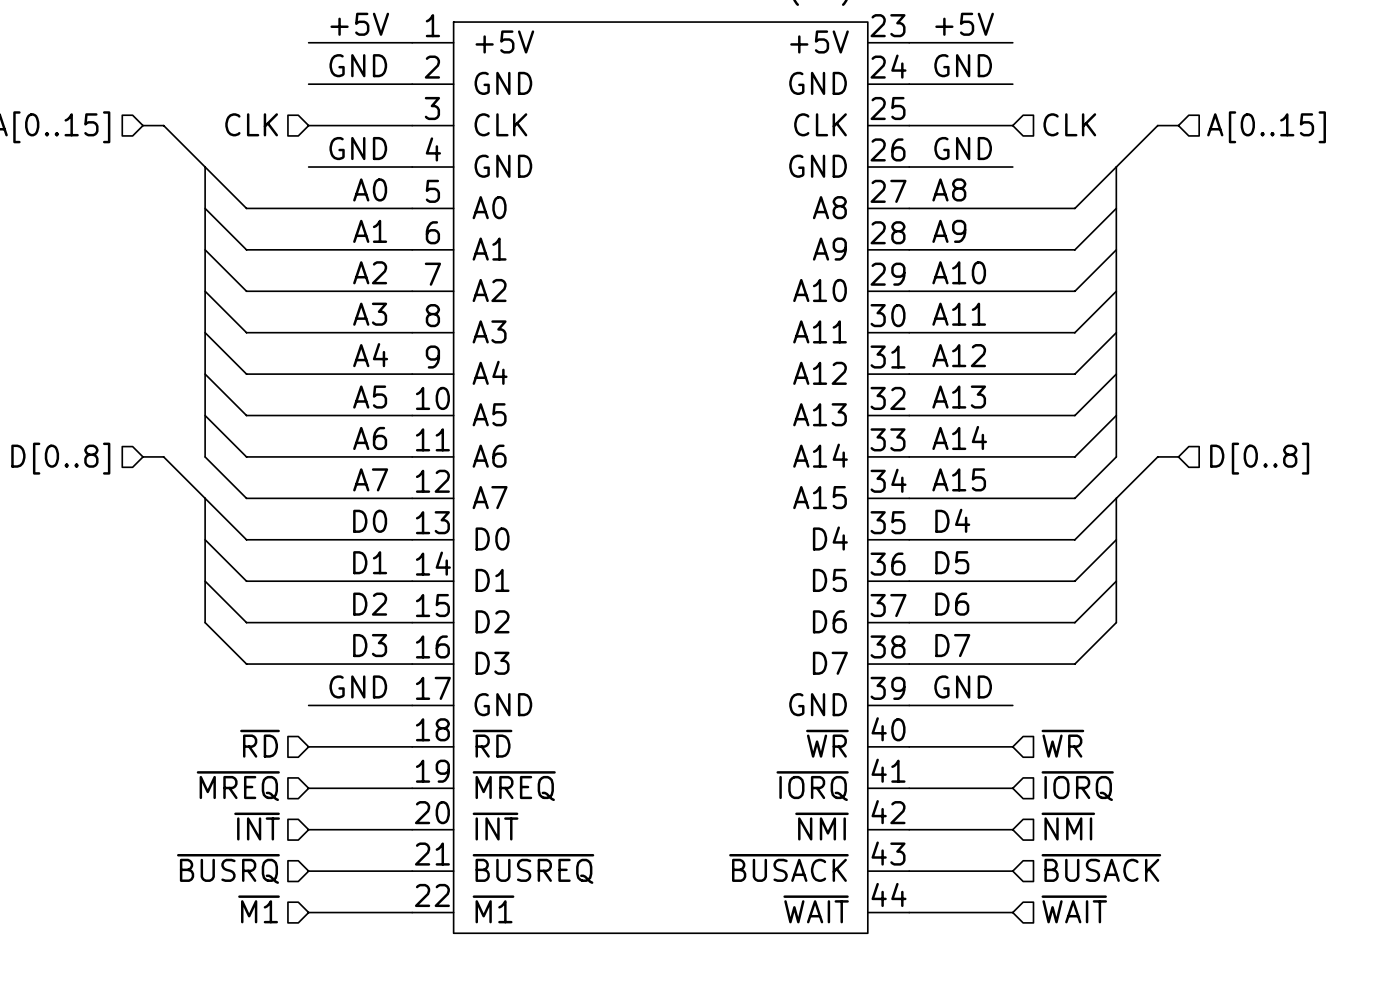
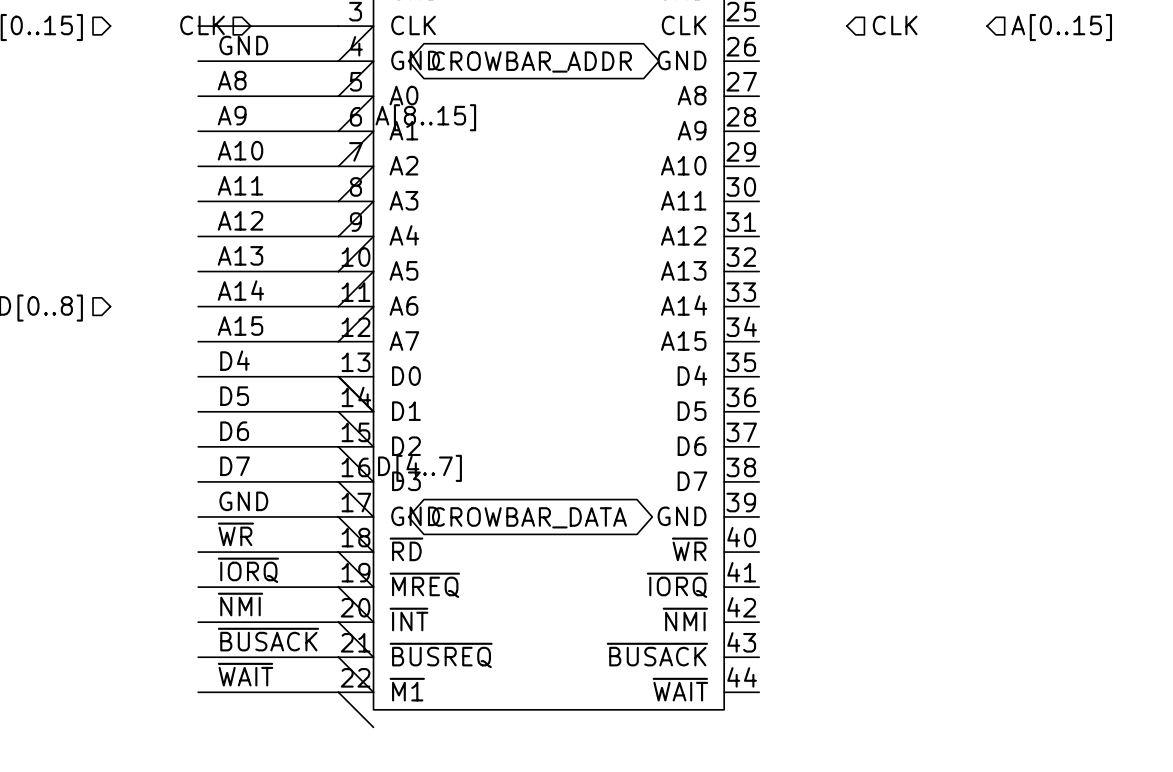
bus: (142, 125) (163, 125) (205, 167) (205, 456) -> none
wire: none -> (198, 26) (250, 26)
wire: none -> (373, 26) (338, 61)
wire: (909, 125) (1012, 125) -> none
bus: (1178, 125) (1157, 125) (1116, 167) (1116, 456) -> none
label position: GND (358, 148) -> GND (243, 45)
label: GND (963, 148) -> none
wire: (205, 167) (246, 208) -> none
wire: none -> (198, 61) (250, 61)
wire: none -> (373, 61) (338, 96)
global label: none -> CROWBAR_ADDR (531, 61)
wire: (909, 167) (1012, 167) -> none
wire: (1116, 167) (1074, 208) (909, 208) -> none
label: none -> A8 (232, 80)
label: A0 (370, 189) -> none
label: A8 (949, 189) -> none
wire: (205, 208) (246, 249) -> none
wire: none -> (373, 96) (338, 131)
wire: (1116, 208) (1074, 249) (909, 249) -> none
label: none -> A9 (232, 115)
label: A1 (370, 231) -> none
label: A9 (949, 231) -> none
label: none -> A[8..15] (425, 117)
wire: (205, 249) (246, 291) -> (338, 376) (373, 411)
wire: none -> (373, 131) (338, 166)
wire: (1116, 249) (1074, 291) (909, 291) -> none
label: none -> A10 (240, 150)
label: A2 (370, 272) -> none
label: A10 (959, 272) -> none
wire: (205, 291) (246, 332) -> (338, 411) (373, 446)
wire: none -> (373, 166) (338, 201)
wire: (1116, 291) (1074, 332) (909, 332) -> none
label: none -> A11 (240, 185)
label: A3 (370, 314) -> none
label: A11 (959, 314) -> none
wire: (205, 332) (246, 374) -> (338, 446) (373, 481)
wire: none -> (373, 201) (338, 236)
wire: (1116, 332) (1074, 374) (909, 374) -> none
label: none -> A12 (240, 220)
label: A4 (370, 355) -> none
label: A12 (959, 355) -> none
wire: (205, 374) (246, 415) -> (338, 481) (373, 516)
wire: none -> (373, 236) (338, 271)
wire: (1116, 374) (1074, 415) (909, 415) -> none
label: none -> A13 (240, 255)
label: A5 (370, 397) -> none
label: A13 (959, 397) -> none
wire: (205, 415) (246, 456) -> (338, 516) (373, 552)
wire: none -> (373, 271) (338, 306)
wire: (1116, 415) (1074, 456) (909, 456) -> none
label: none -> A14 (240, 290)
label: A14 (959, 437) -> none
label: A6 (370, 438) -> none
bus: (142, 456) (163, 456) (205, 498) (205, 622) -> none
wire: (205, 456) (246, 498) -> (338, 552) (373, 587)
wire: none -> (373, 306) (338, 341)
wire: (1116, 456) (1074, 498) (909, 498) -> none
bus: (1178, 456) (1157, 456) (1116, 498) (1116, 622) -> none
hierarchical label: D[0..8] (1259, 458) -> none
label: none -> A15 (240, 326)
label: A7 (370, 479) -> none
label: A15 (959, 479) -> none
wire: (205, 498) (246, 539) -> (338, 587) (373, 622)
wire: (1116, 498) (1074, 539) (909, 539) -> none
label: none -> D4 (235, 360)
label: D4 (952, 520) -> none
label: D0 (370, 521) -> none
wire: (205, 539) (246, 581) -> (338, 622) (373, 657)
wire: (1116, 539) (1074, 581) (909, 581) -> none
label: none -> D5 (234, 396)
label: D1 (370, 562) -> none
label: D5 (952, 562) -> none
wire: (205, 581) (246, 622) -> (338, 657) (373, 692)
wire: (1116, 581) (1074, 622) (909, 622) -> none
label: none -> D6 (234, 431)
label: D2 (370, 604) -> none
label: D6 (952, 604) -> none
wire: (205, 622) (246, 664) -> (338, 692) (373, 727)
wire: (1116, 622) (1074, 664) (909, 664) -> none
label: none -> D7 (235, 466)
label: D3 (370, 645) -> none
label: D7 (952, 645) -> none
label: none -> D[4..7] (419, 468)
label position: GND (358, 686) -> GND (243, 501)
label: GND (963, 686) -> none
wire: none -> (198, 516) (250, 516)
wire: (909, 705) (1012, 705) -> none
global label: none -> CROWBAR_DATA (529, 517)
label: none -> ~{WR} (235, 534)
hierarchical label: ~{RD} (260, 743) -> none
hierarchical label: ~{WR} (1062, 743) -> none
wire: none -> (198, 552) (250, 552)
wire: (909, 746) (1012, 746) -> none
label: none -> ~{IORQ} (248, 570)
hierarchical label: ~{MREQ} (238, 786) -> none
hierarchical label: ~{IORQ} (1077, 786) -> none
wire: none -> (198, 587) (250, 587)
wire: (909, 788) (1012, 788) -> none
label: none -> ~{NMI} (240, 604)
hierarchical label: ~{INT} (257, 826) -> none
hierarchical label: ~{NMI} (1068, 826) -> none
wire: none -> (198, 622) (250, 622)
wire: (909, 829) (1012, 829) -> none
label: none -> ~{BUSACK} (268, 639)
hierarchical label: ~{BUSACK} (1101, 867) -> none
hierarchical label: ~{BUSRQ} (228, 868) -> none
wire: none -> (198, 657) (250, 657)
wire: (909, 871) (1012, 871) -> none
label: none -> ~{WAIT} (245, 674)
hierarchical label: ~{M1} (259, 909) -> none
hierarchical label: ~{WAIT} (1074, 909) -> none
wire: none -> (198, 692) (250, 692)
wire: (909, 912) (1012, 912) -> none

